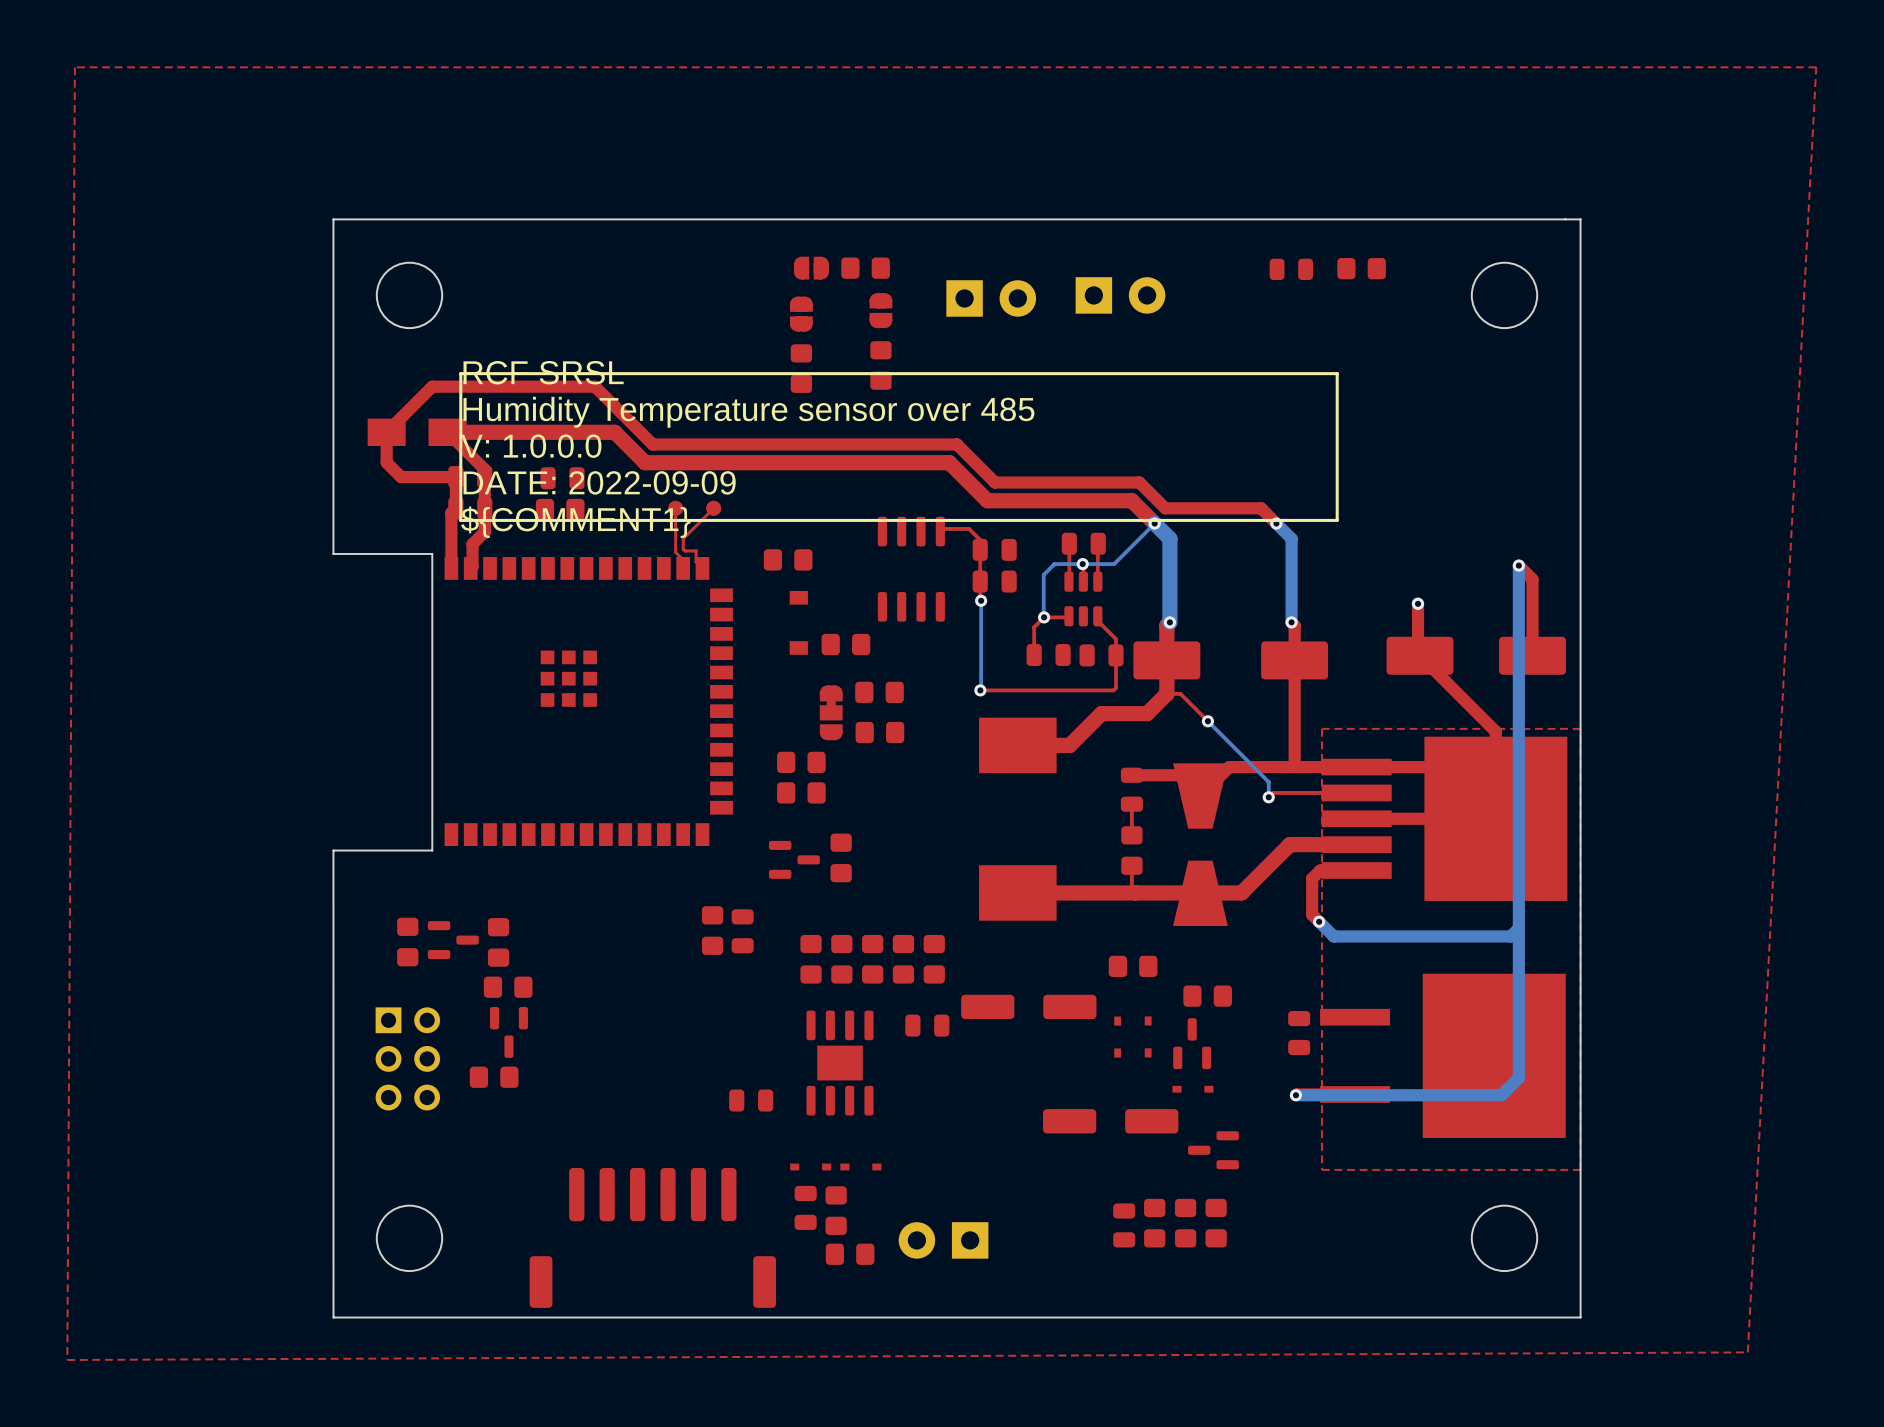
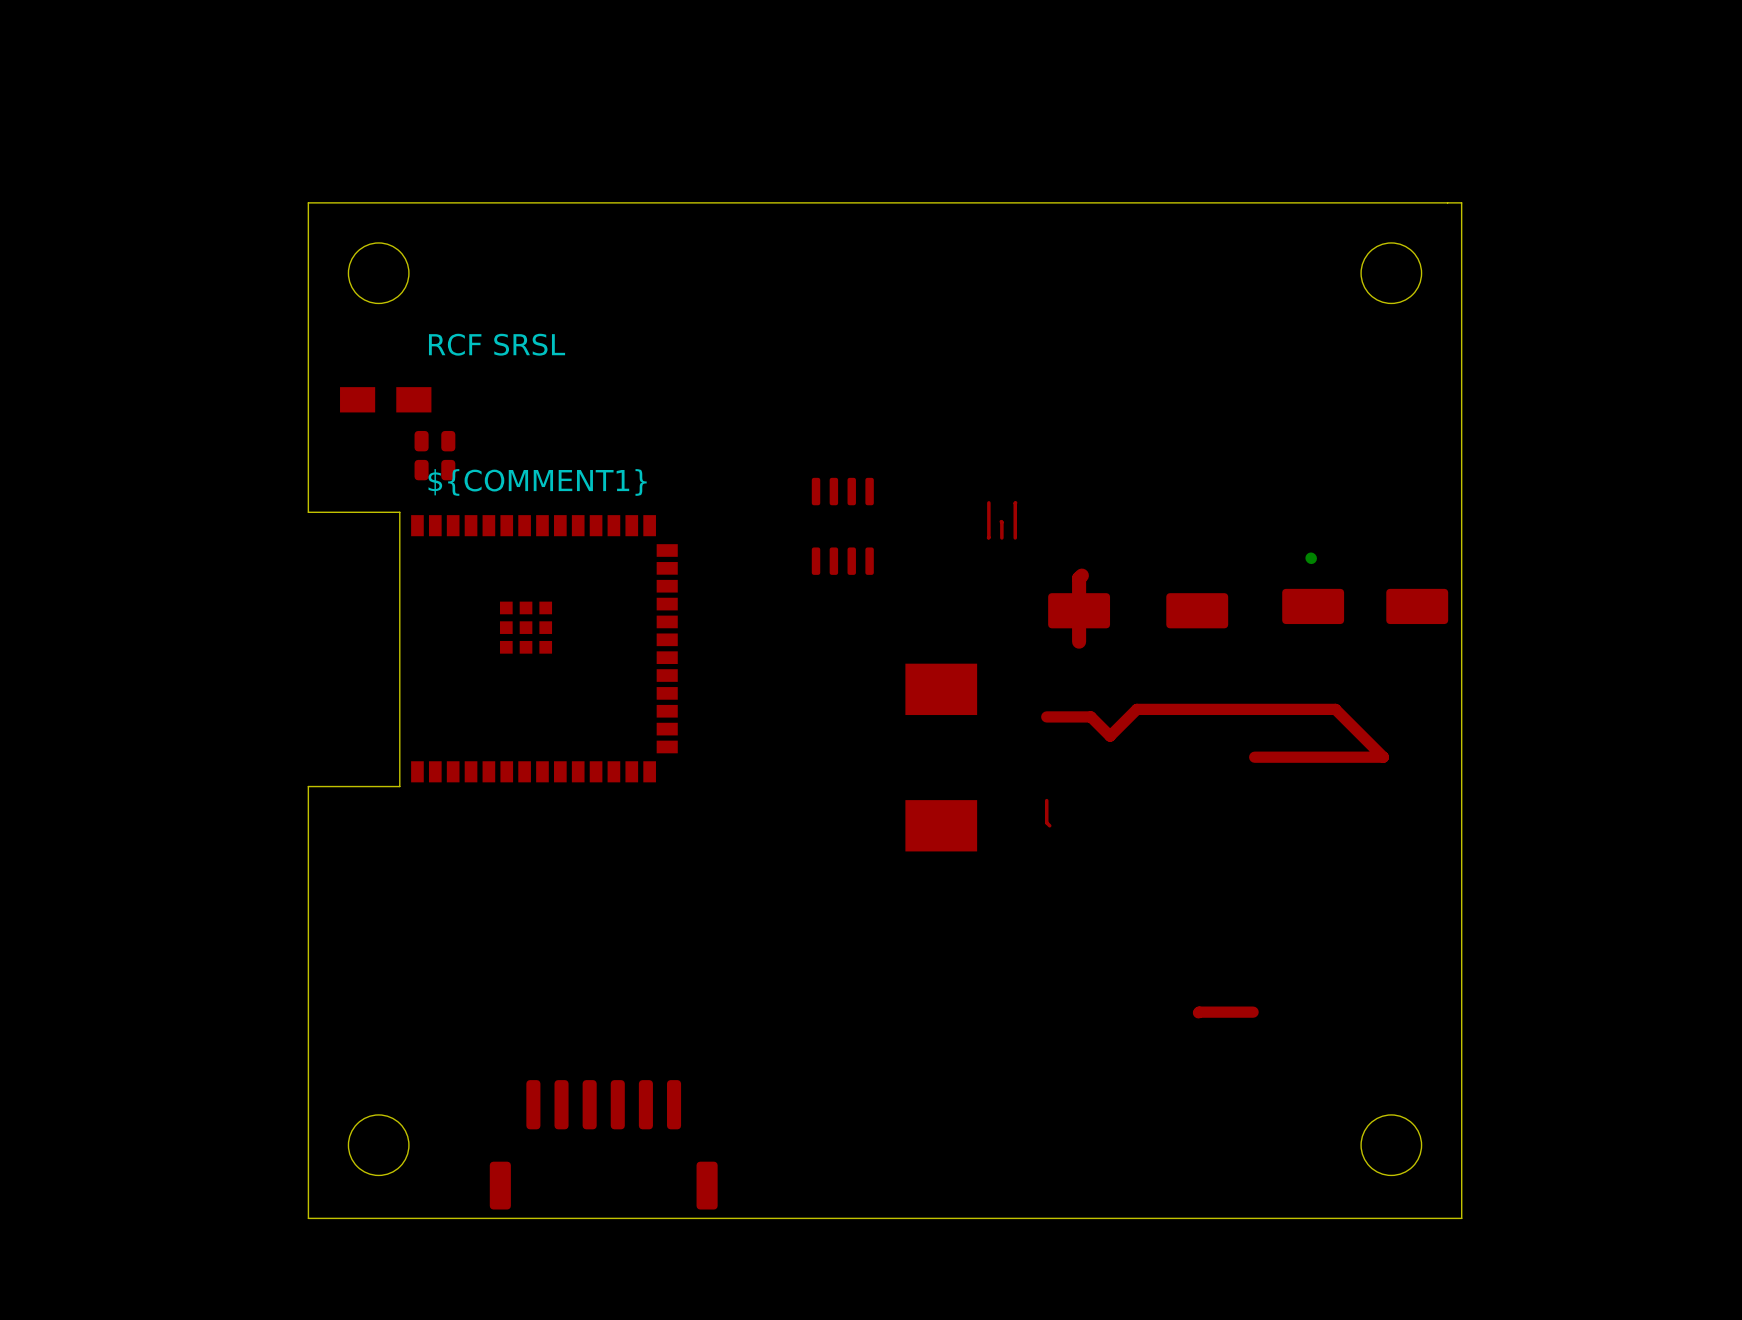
top zone outline: (1816, 67) (1747, 1352) (67, 1360) (74, 67) (1816, 67) -> none
part: (811, 268) -> none
part: (865, 268) -> none
part: (1361, 268) -> none
part: (1291, 269) -> none
part: (1120, 295) -> none
part: (991, 298) -> none
part: (880, 310) -> none
part: (801, 314) -> none
part: (880, 365) -> none
part: (801, 368) -> none
line: (1337, 373) (460, 373) (460, 520) (1337, 520) (1337, 373) -> none
text: Humidity Temperature sensor over 485 (748, 412) -> none
top track: (447, 432) (484, 469) (484, 531) (472, 544) (472, 566) (470, 568) -> none
top track: (447, 432) (614, 432) (645, 462) (949, 462) (987, 500) (1131, 500) (1154, 523) -> none
text: V: 1.0.0.0 (531, 446) -> none
part: (562, 478) -> none
text: DATE: 2022-09-09 (599, 482) -> none
top track: (675, 508) (675, 552) (683, 559) (683, 568) -> none
part: (675, 508) -> none
top track: (713, 508) (683, 538) (683, 549) (685, 550) (696, 550) (696, 562) (702, 568) -> none
part: (713, 508) -> none
part: (560, 509) -> none
via: (1154, 523) -> none
top track: (1276, 523) (1261, 508) (1165, 508) (1139, 482) (994, 482) (956, 444) (652, 444) (594, 386) (432, 386) (386, 432) (386, 462) (401, 477) (455, 477) (455, 508) (451, 512) (451, 568) -> none
bottom track: (1276, 523) (1291, 538) (1291, 622) -> none
via: (1276, 523) -> none
top track: (940, 531) (942, 528) (969, 528) (980, 539) (981, 600) -> none
part: (1083, 543) -> none
part: (994, 549) -> none
part: (788, 559) -> none
via: (1082, 564) -> none
top track: (1518, 565) (1532, 579) (1532, 655) -> none
bottom track: (1518, 565) (1518, 1077) (1501, 1095) (1295, 1095) -> none
via: (1518, 565) -> none
part: (994, 581) -> none
part: (1083, 598) -> none
bottom track: (981, 600) (980, 690) -> none
via: (981, 600) -> none
top track: (1418, 603) (1418, 653) (1495, 731) (1495, 818) -> none
via: (1418, 603) -> none
top track: (1068, 616) (1044, 617) (1034, 627) (1034, 655) -> none
top track: (1097, 616) (1097, 620) (1115, 639) (1115, 688) (1113, 690) (980, 690) -> none
bottom track: (1044, 617) (1043, 574) (1054, 564) (1114, 564) (1154, 523) (1169, 538) (1169, 622) -> none
via: (1044, 617) -> none
part: (798, 622) -> none
via: (1169, 622) -> none
top track: (1291, 622) (1294, 625) (1294, 764) (1291, 767) -> none
via: (1291, 622) -> none
part: (845, 644) -> none
part: (1048, 655) -> none
part: (1101, 655) -> none
via: (980, 690) -> none
part: (879, 692) -> none
part: (831, 712) -> none
top track: (1207, 721) (1180, 693) (1166, 693) (1147, 713) (1101, 713) (1069, 745) (1017, 745) -> none
bottom track: (1207, 721) (1268, 782) (1268, 797) -> none
via: (1207, 721) -> none
top zone outline: (1580, 728) (1580, 1169) (1321, 1169) (1321, 728) (1580, 728) -> none
part: (879, 732) -> none
part: (801, 762) -> none
part: (1131, 789) -> none
part: (801, 792) -> none
top track: (1356, 792) (1273, 792) (1268, 797) -> none
via: (1268, 797) -> none
top track: (1131, 804) (1131, 835) -> none
part: (1444, 818) -> none
part: (1200, 844) -> none
top track: (1356, 844) (1289, 844) (1241, 892) (1017, 892) -> none
part: (1131, 850) -> none
part: (841, 857) -> none
part: (794, 859) -> none
top track: (1356, 870) (1320, 870) (1312, 878) (1312, 914) (1319, 921) -> none
bottom track: (1319, 921) (1333, 936) (1510, 936) (1518, 928) -> none
via: (1319, 921) -> none
part: (712, 930) -> none
part: (742, 931) -> none
part: (453, 940) -> none
part: (407, 942) -> none
part: (498, 942) -> none
part: (811, 959) -> none
part: (841, 959) -> none
part: (872, 959) -> none
part: (903, 959) -> none
part: (934, 959) -> none
part: (1133, 966) -> none
part: (508, 987) -> none
part: (1207, 996) -> none
part: (1028, 1006) -> none
part: (927, 1025) -> none
part: (508, 1032) -> none
part: (1299, 1033) -> none
part: (1148, 1036) -> none
part: (1117, 1037) -> none
part: (1192, 1043) -> none
part: (1442, 1055) -> none
part: (407, 1058) -> none
part: (840, 1063) -> none
part: (494, 1077) -> none
part: (1192, 1089) -> none
via: (1295, 1095) -> none
part: (751, 1100) -> none
part: (1110, 1121) -> none
part: (1213, 1150) -> none
part: (810, 1166) -> none
part: (860, 1166) -> none
part: (805, 1207) -> none
part: (836, 1210) -> none
part: (1154, 1223) -> none
part: (1185, 1223) -> none
part: (1216, 1223) -> none
part: (1124, 1225) -> none
part: (943, 1240) -> none
part: (850, 1254) -> none

